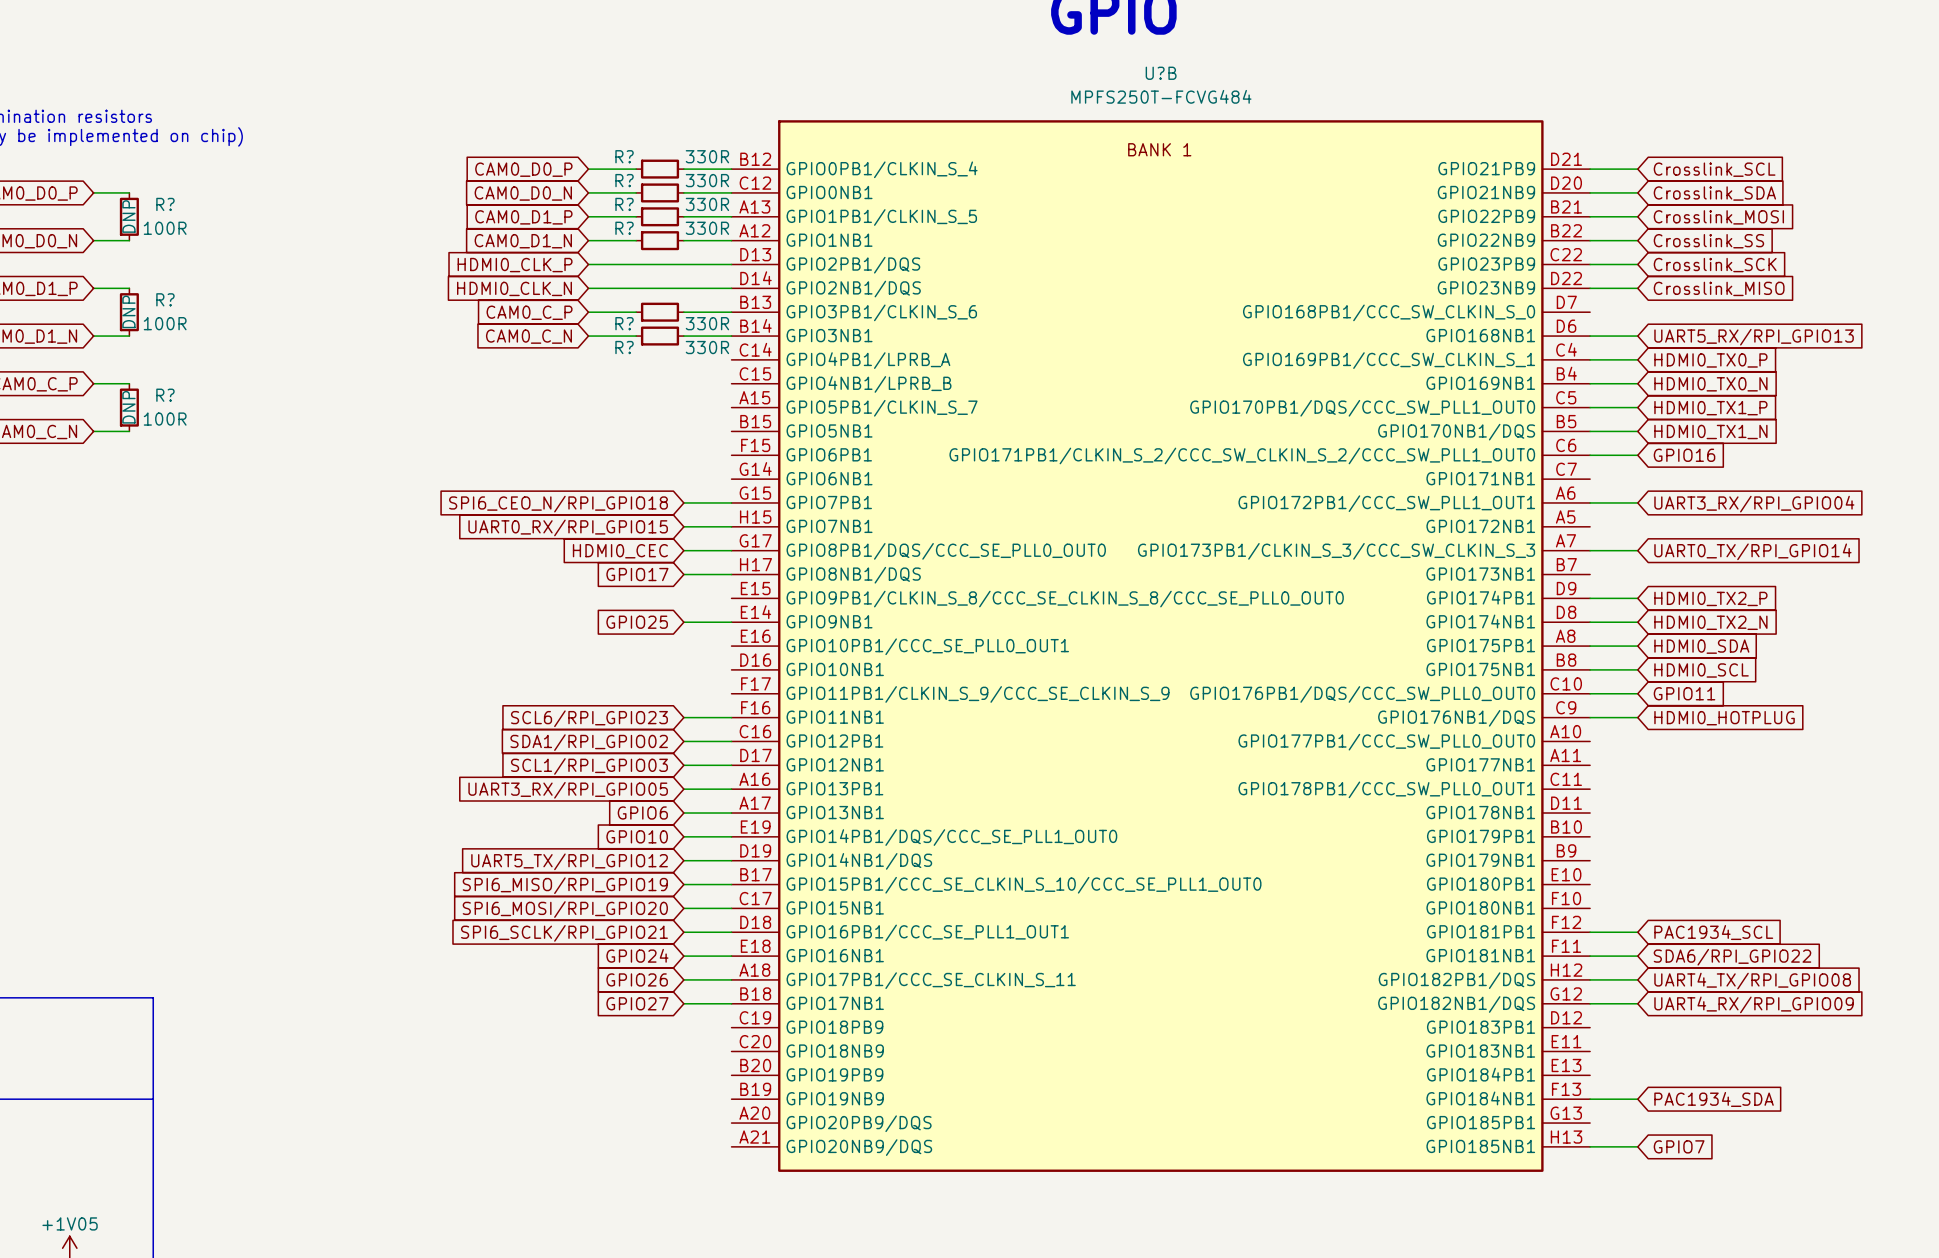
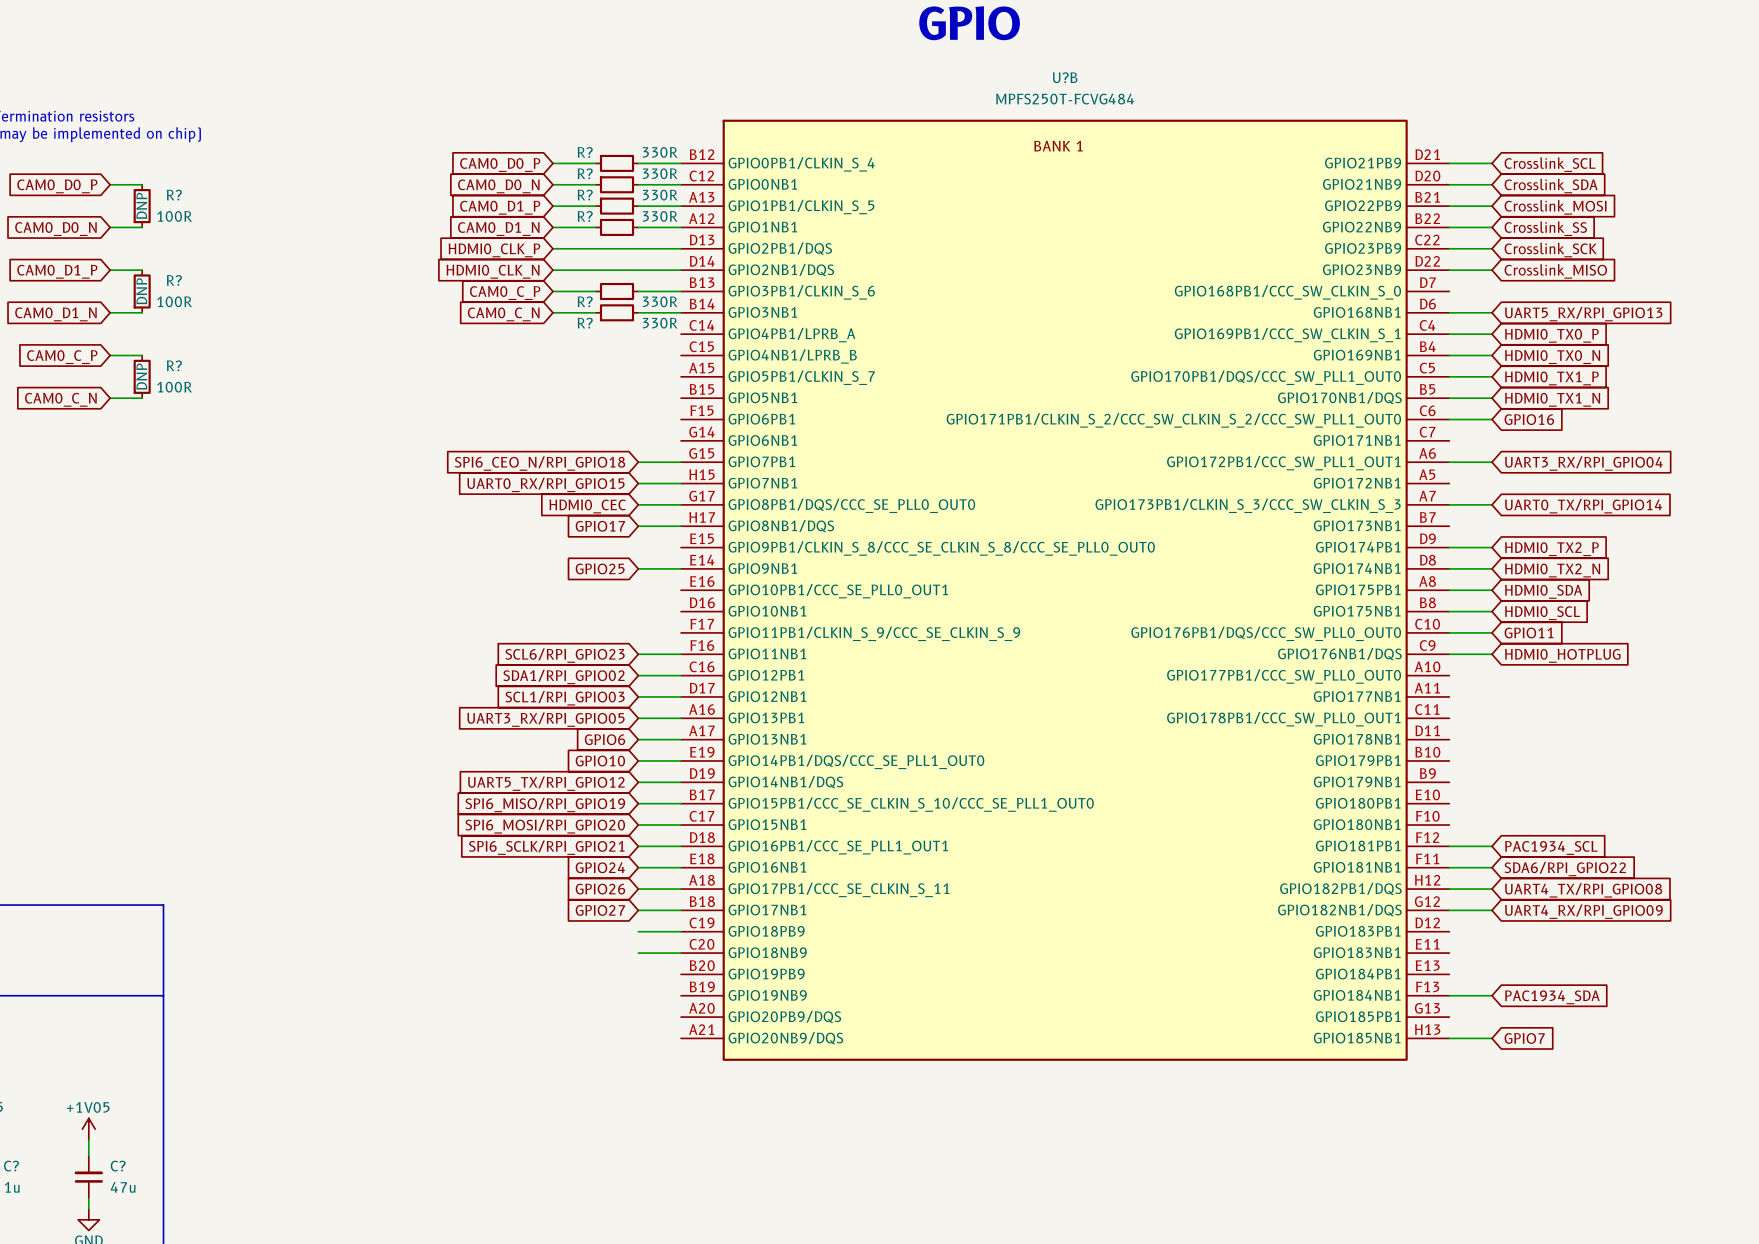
wire: none -> (638, 931) (681, 931)
wire: none -> (638, 953) (681, 953)

